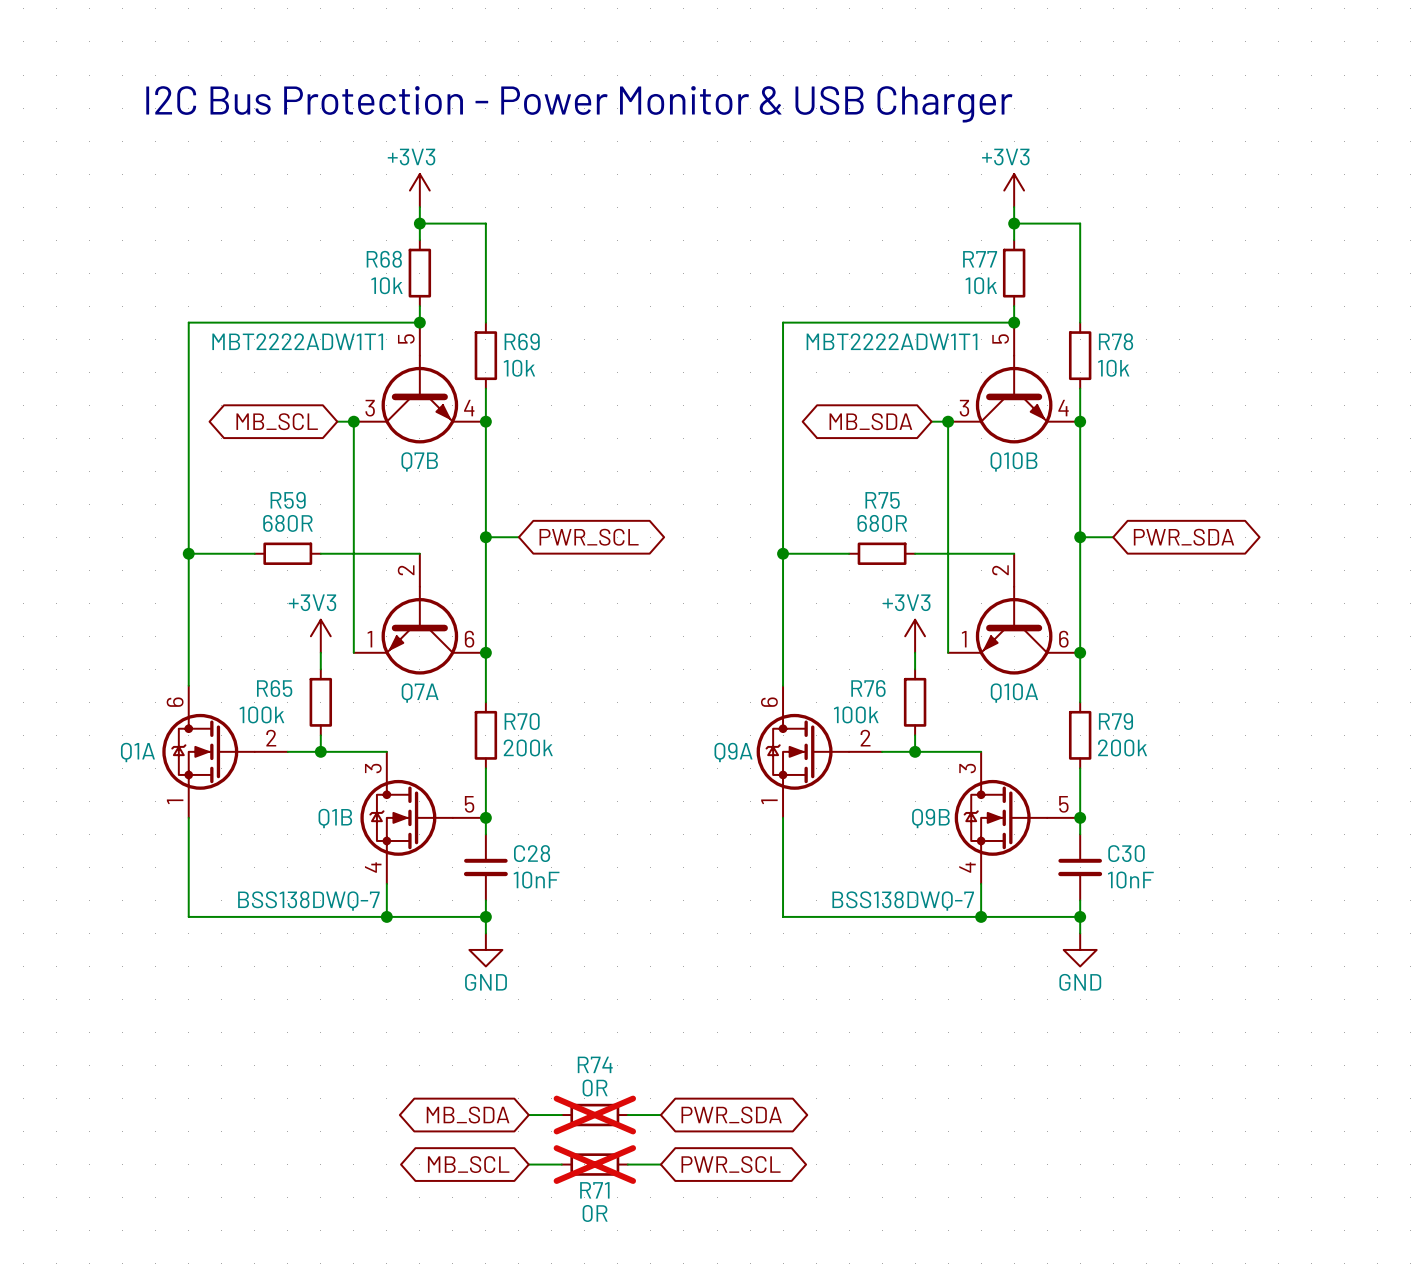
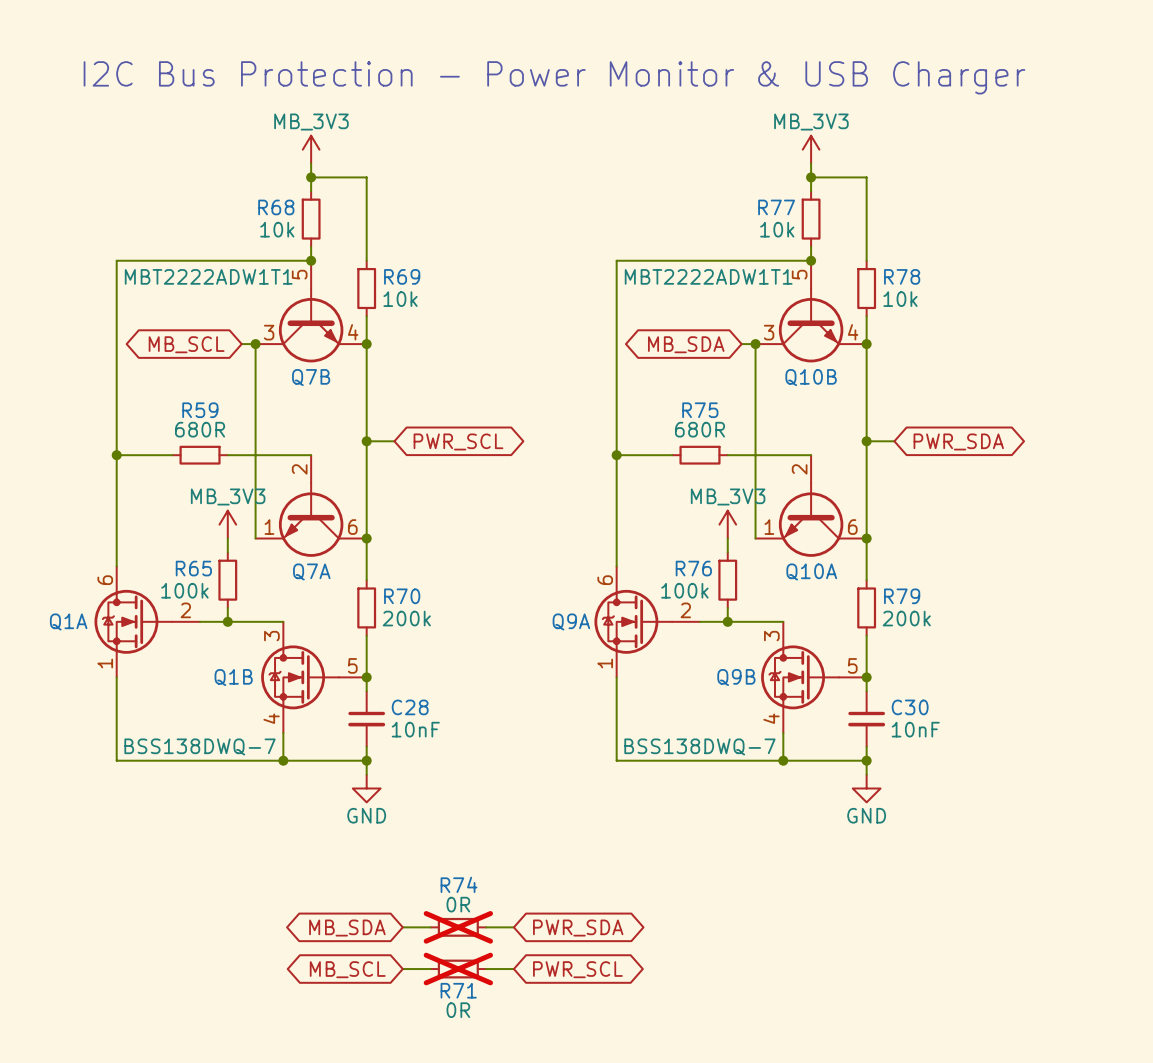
power symbol: +3V3 (419, 190) -> MB_3V3 (311, 149)
power symbol: +3V3 (1014, 190) -> MB_3V3 (811, 149)
power symbol: +3V3 (320, 636) -> MB_3V3 (227, 524)
power symbol: +3V3 (915, 636) -> MB_3V3 (727, 524)

